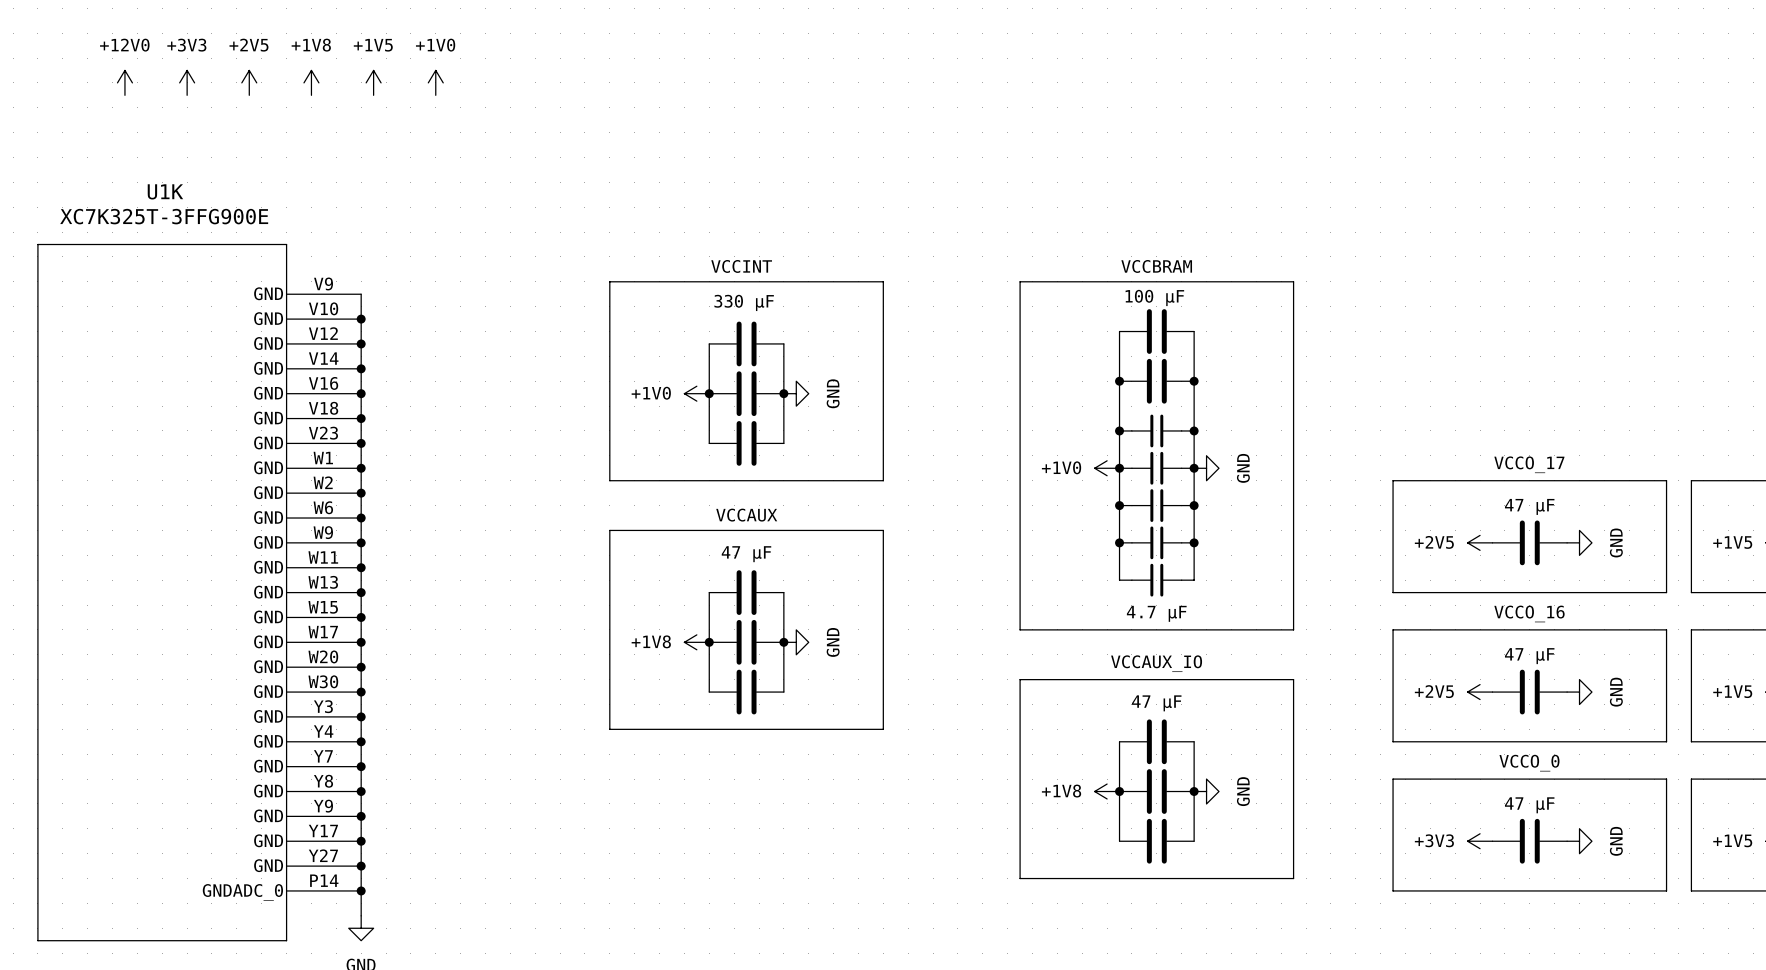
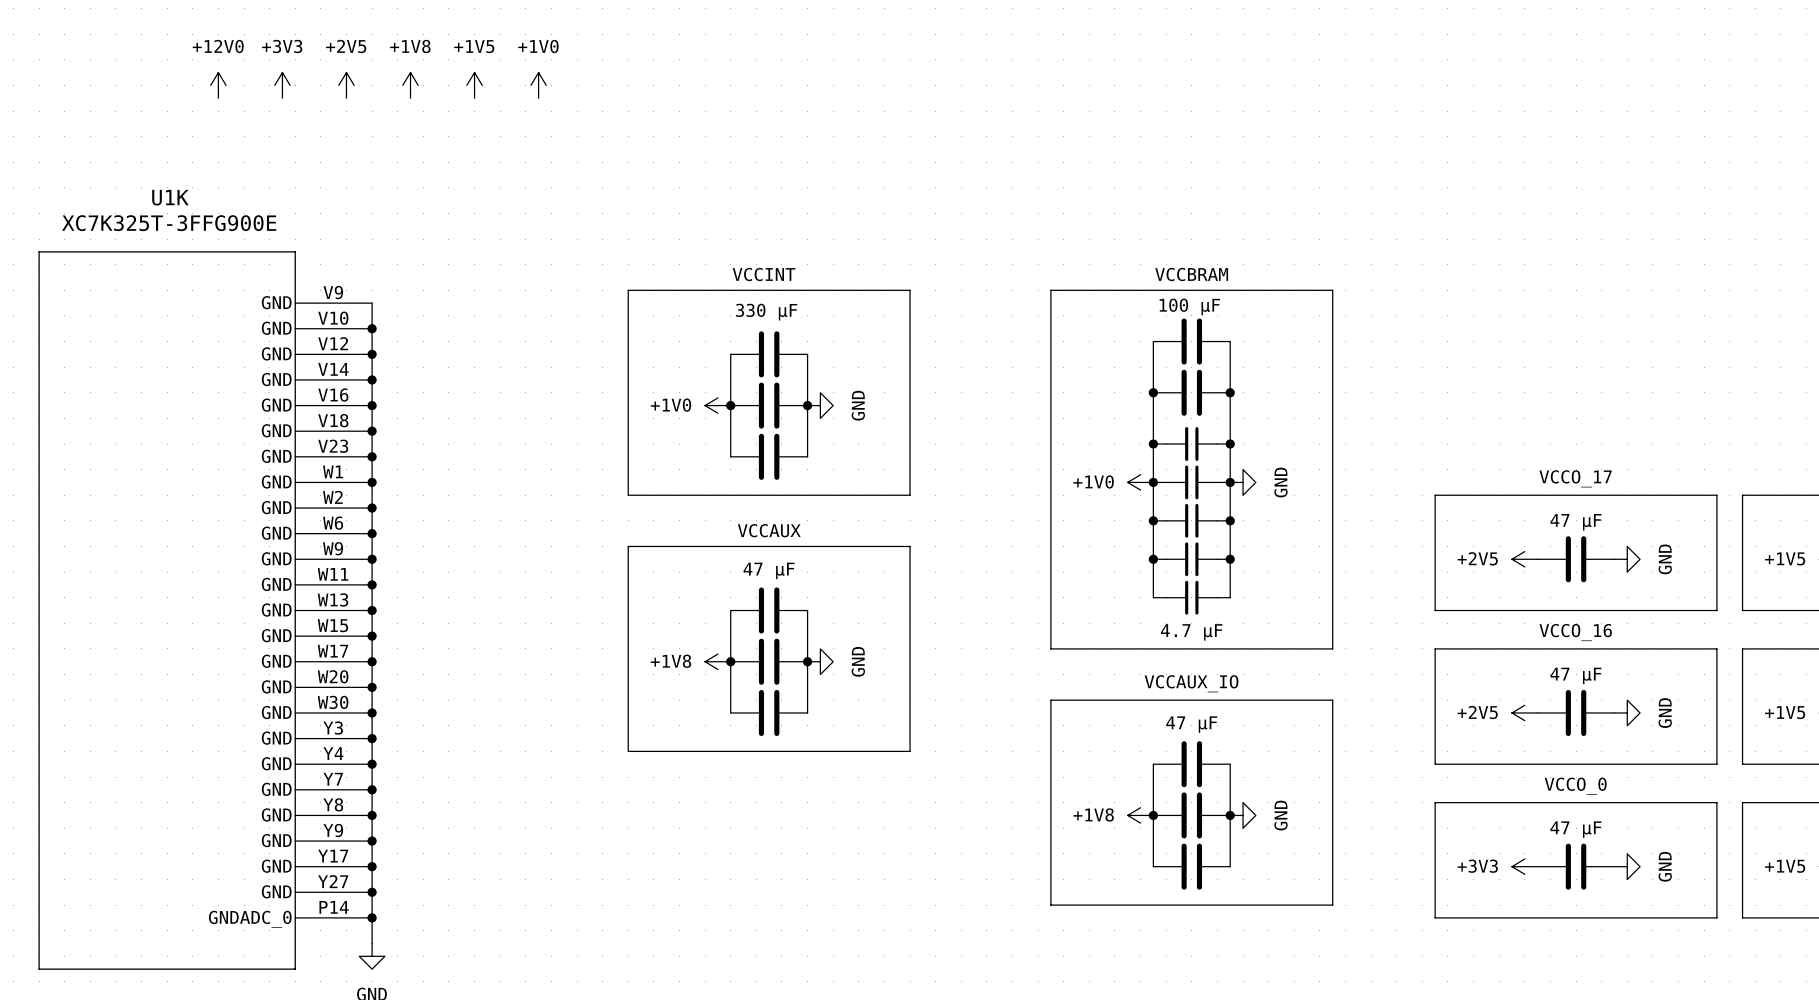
power symbol position: +12V0 (124, 82) -> +12V0 (218, 85)
power symbol position: +3V3 (187, 82) -> +3V3 (282, 85)
power symbol position: +2V5 (249, 82) -> +2V5 (346, 85)
power symbol position: +1V8 (311, 82) -> +1V8 (410, 85)
power symbol position: +1V5 (373, 82) -> +1V5 (474, 85)
power symbol position: +1V0 (435, 82) -> +1V0 (538, 85)

